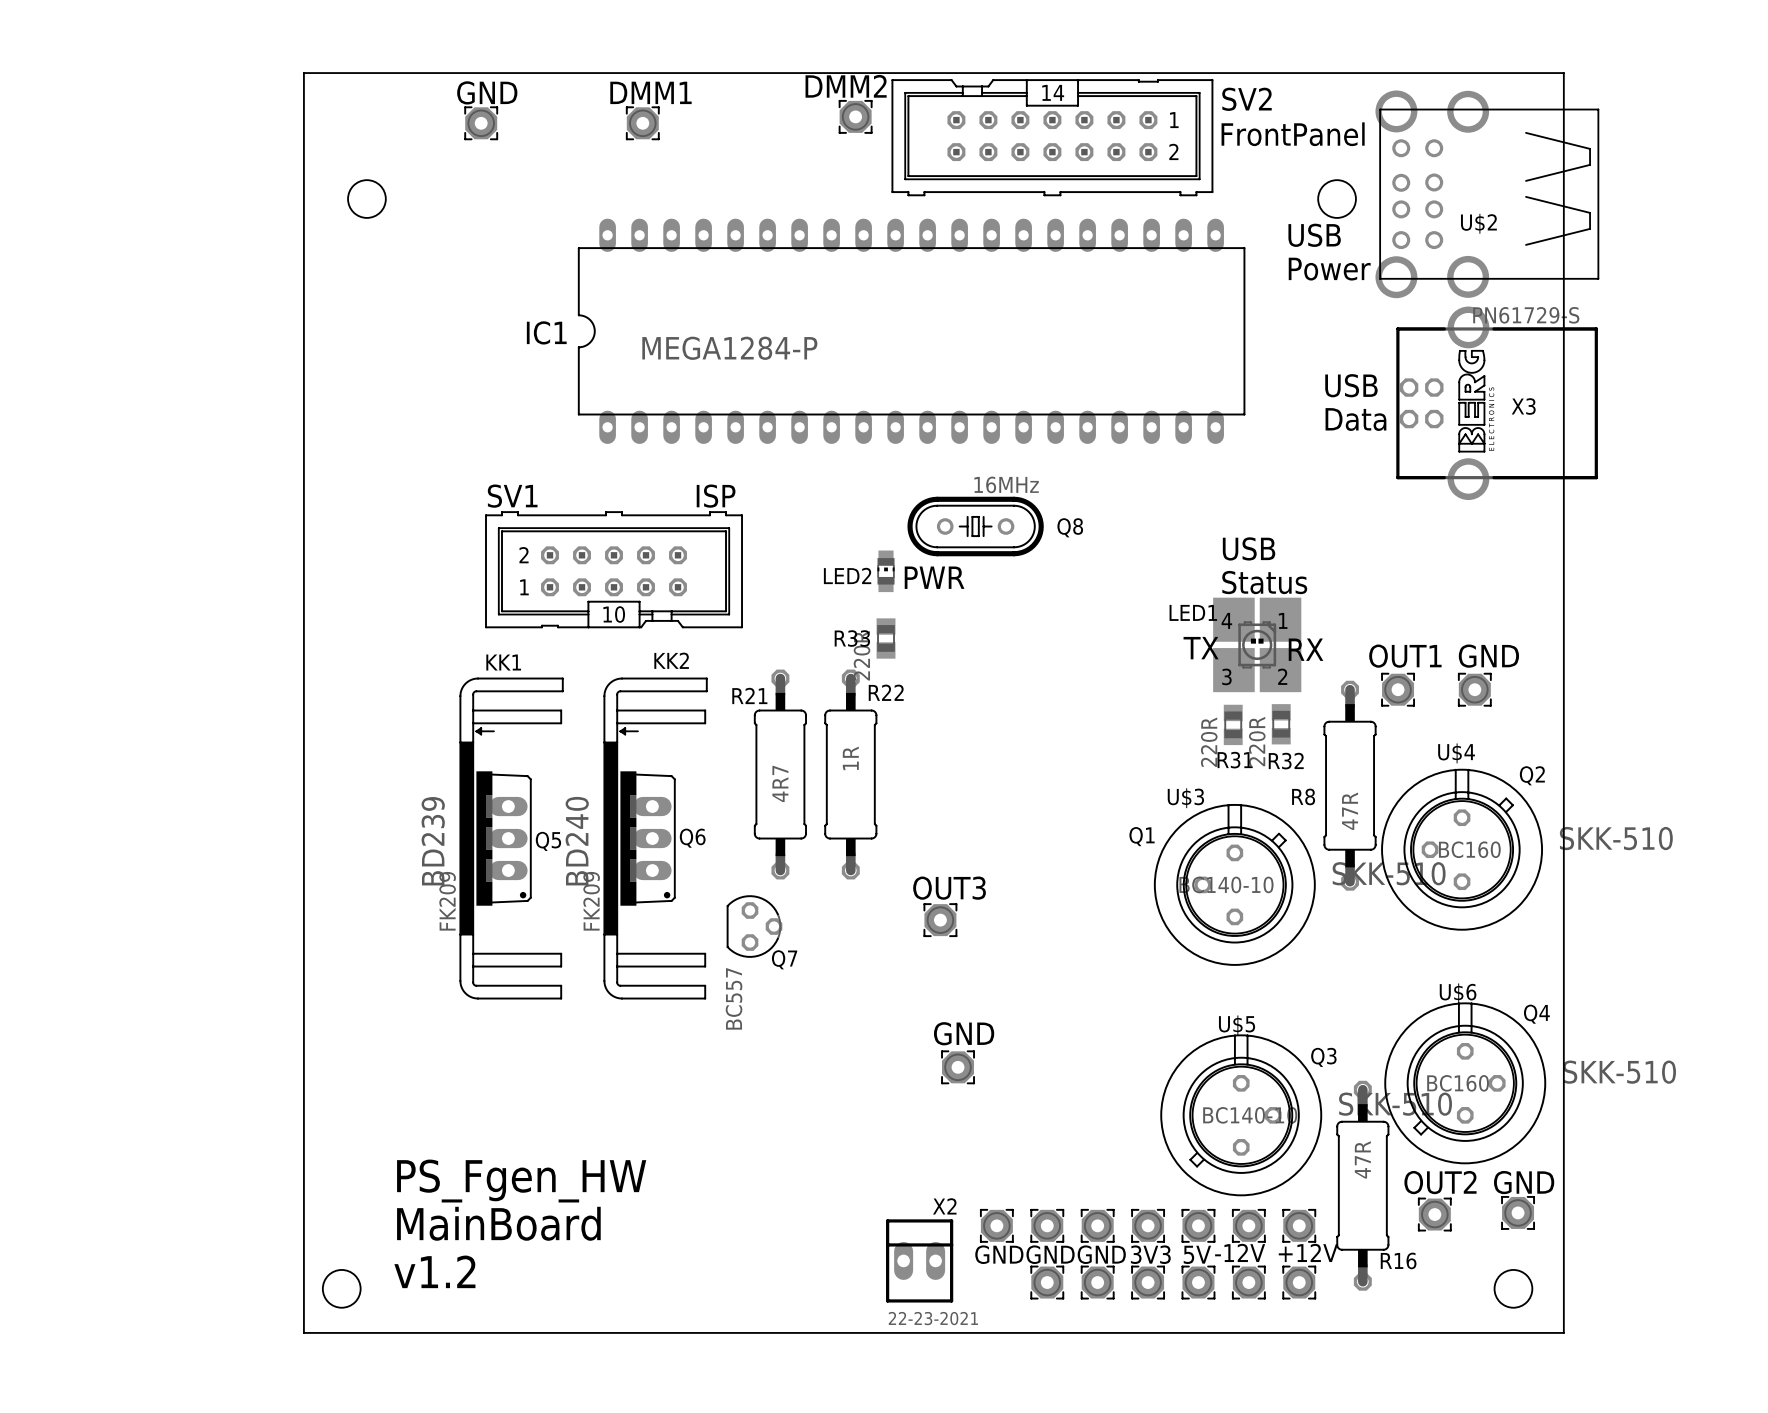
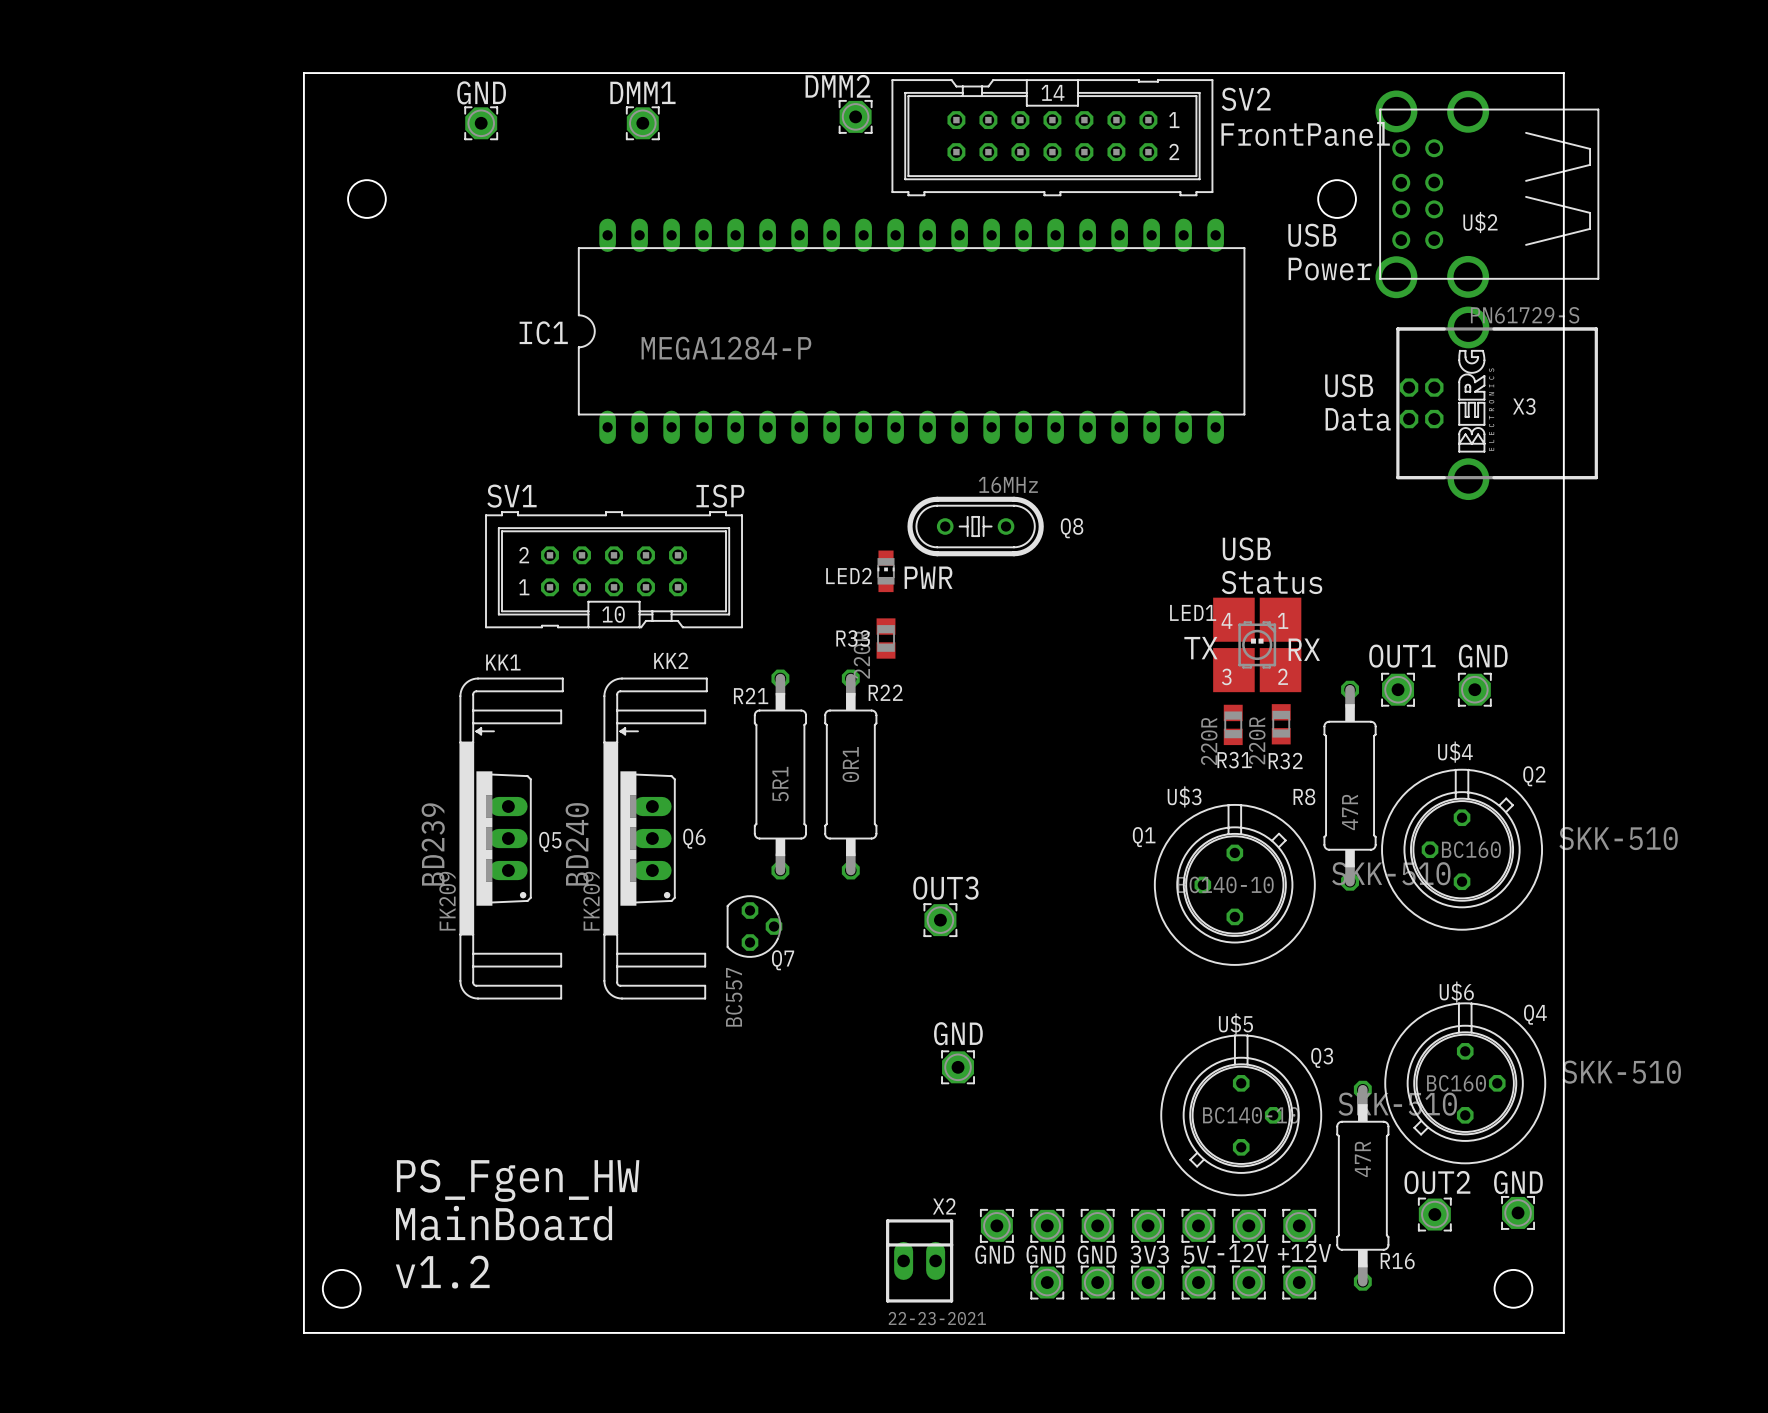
R22 value: 1R (850, 758) -> 0R1 (850, 764)
R21 value: 4R7 (780, 783) -> 5R1 (780, 784)

